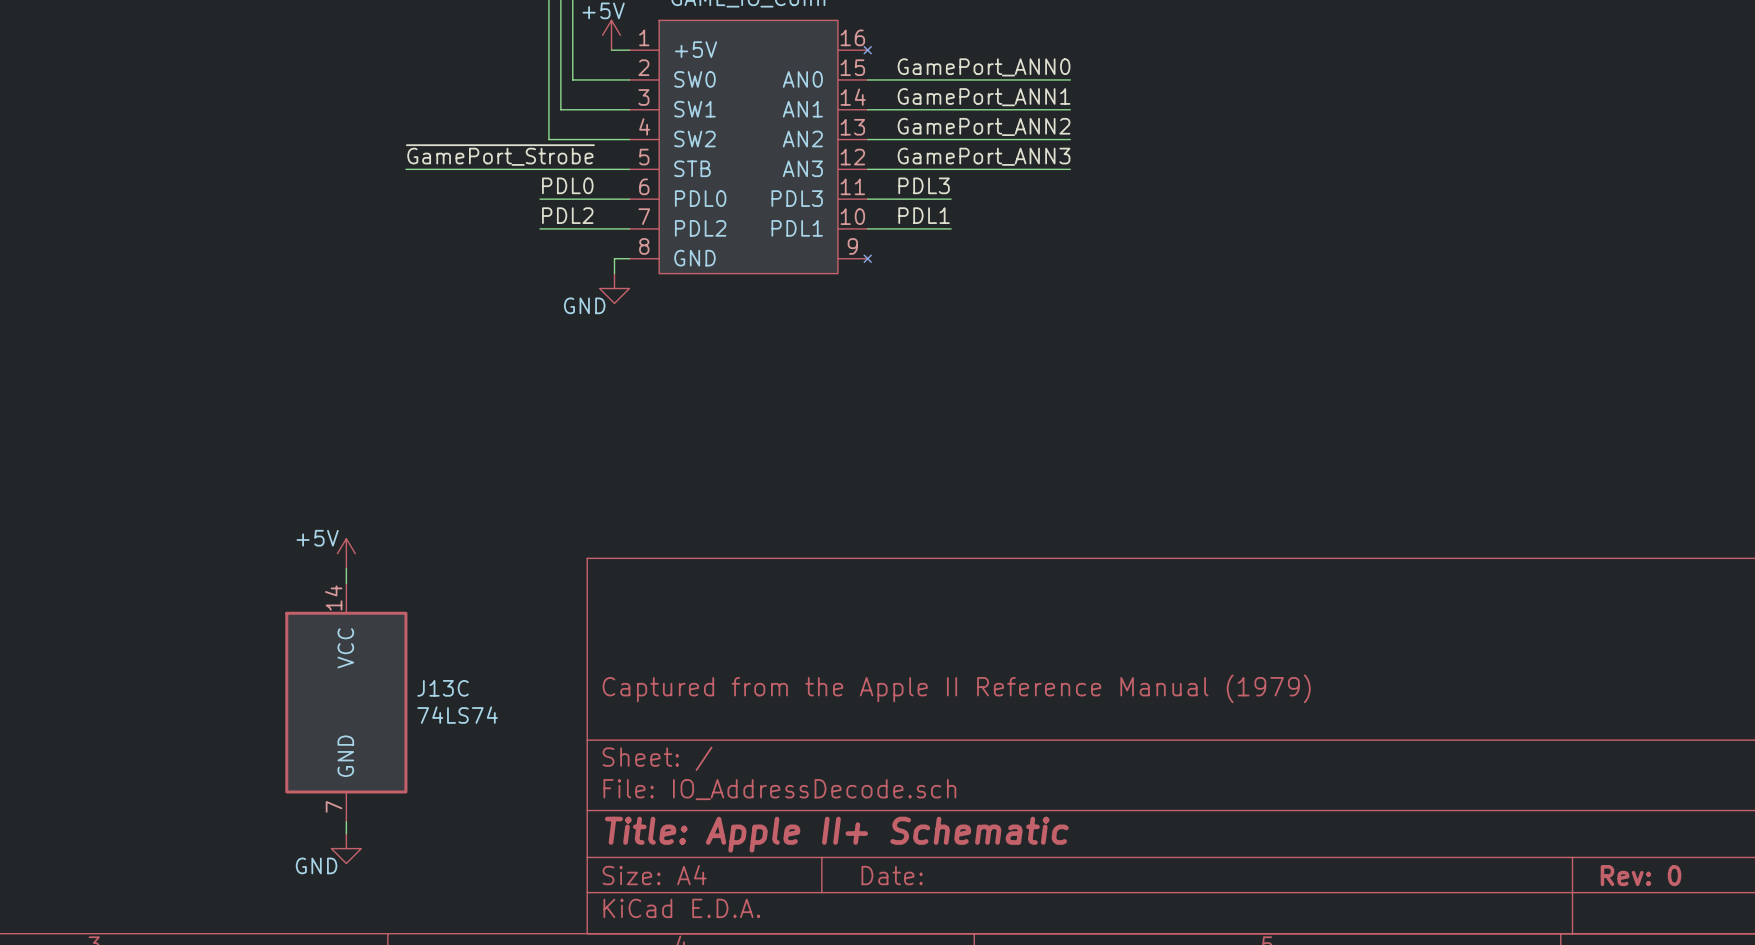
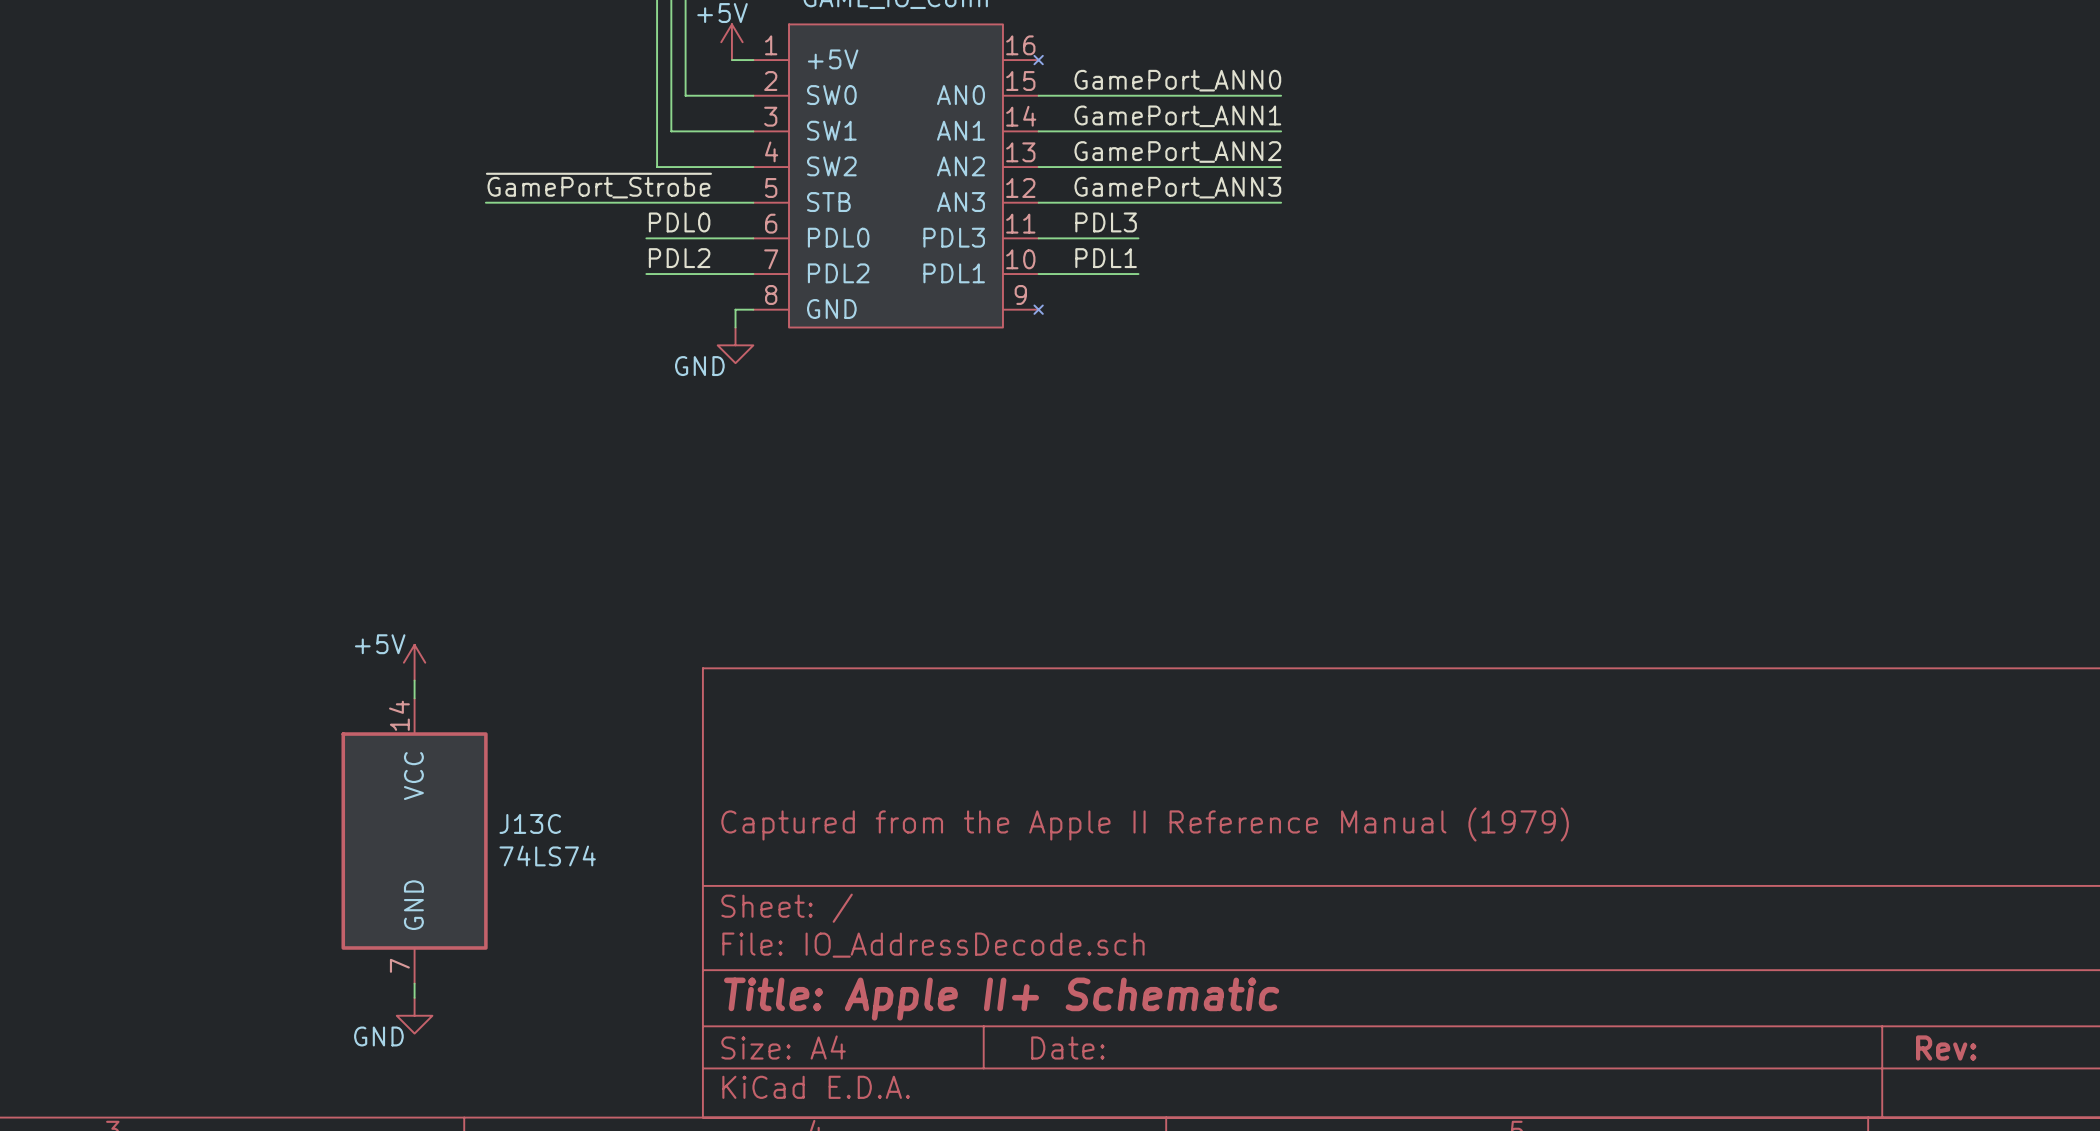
title block: Rev: 0 (1641, 875) -> Rev: (1946, 1048)

